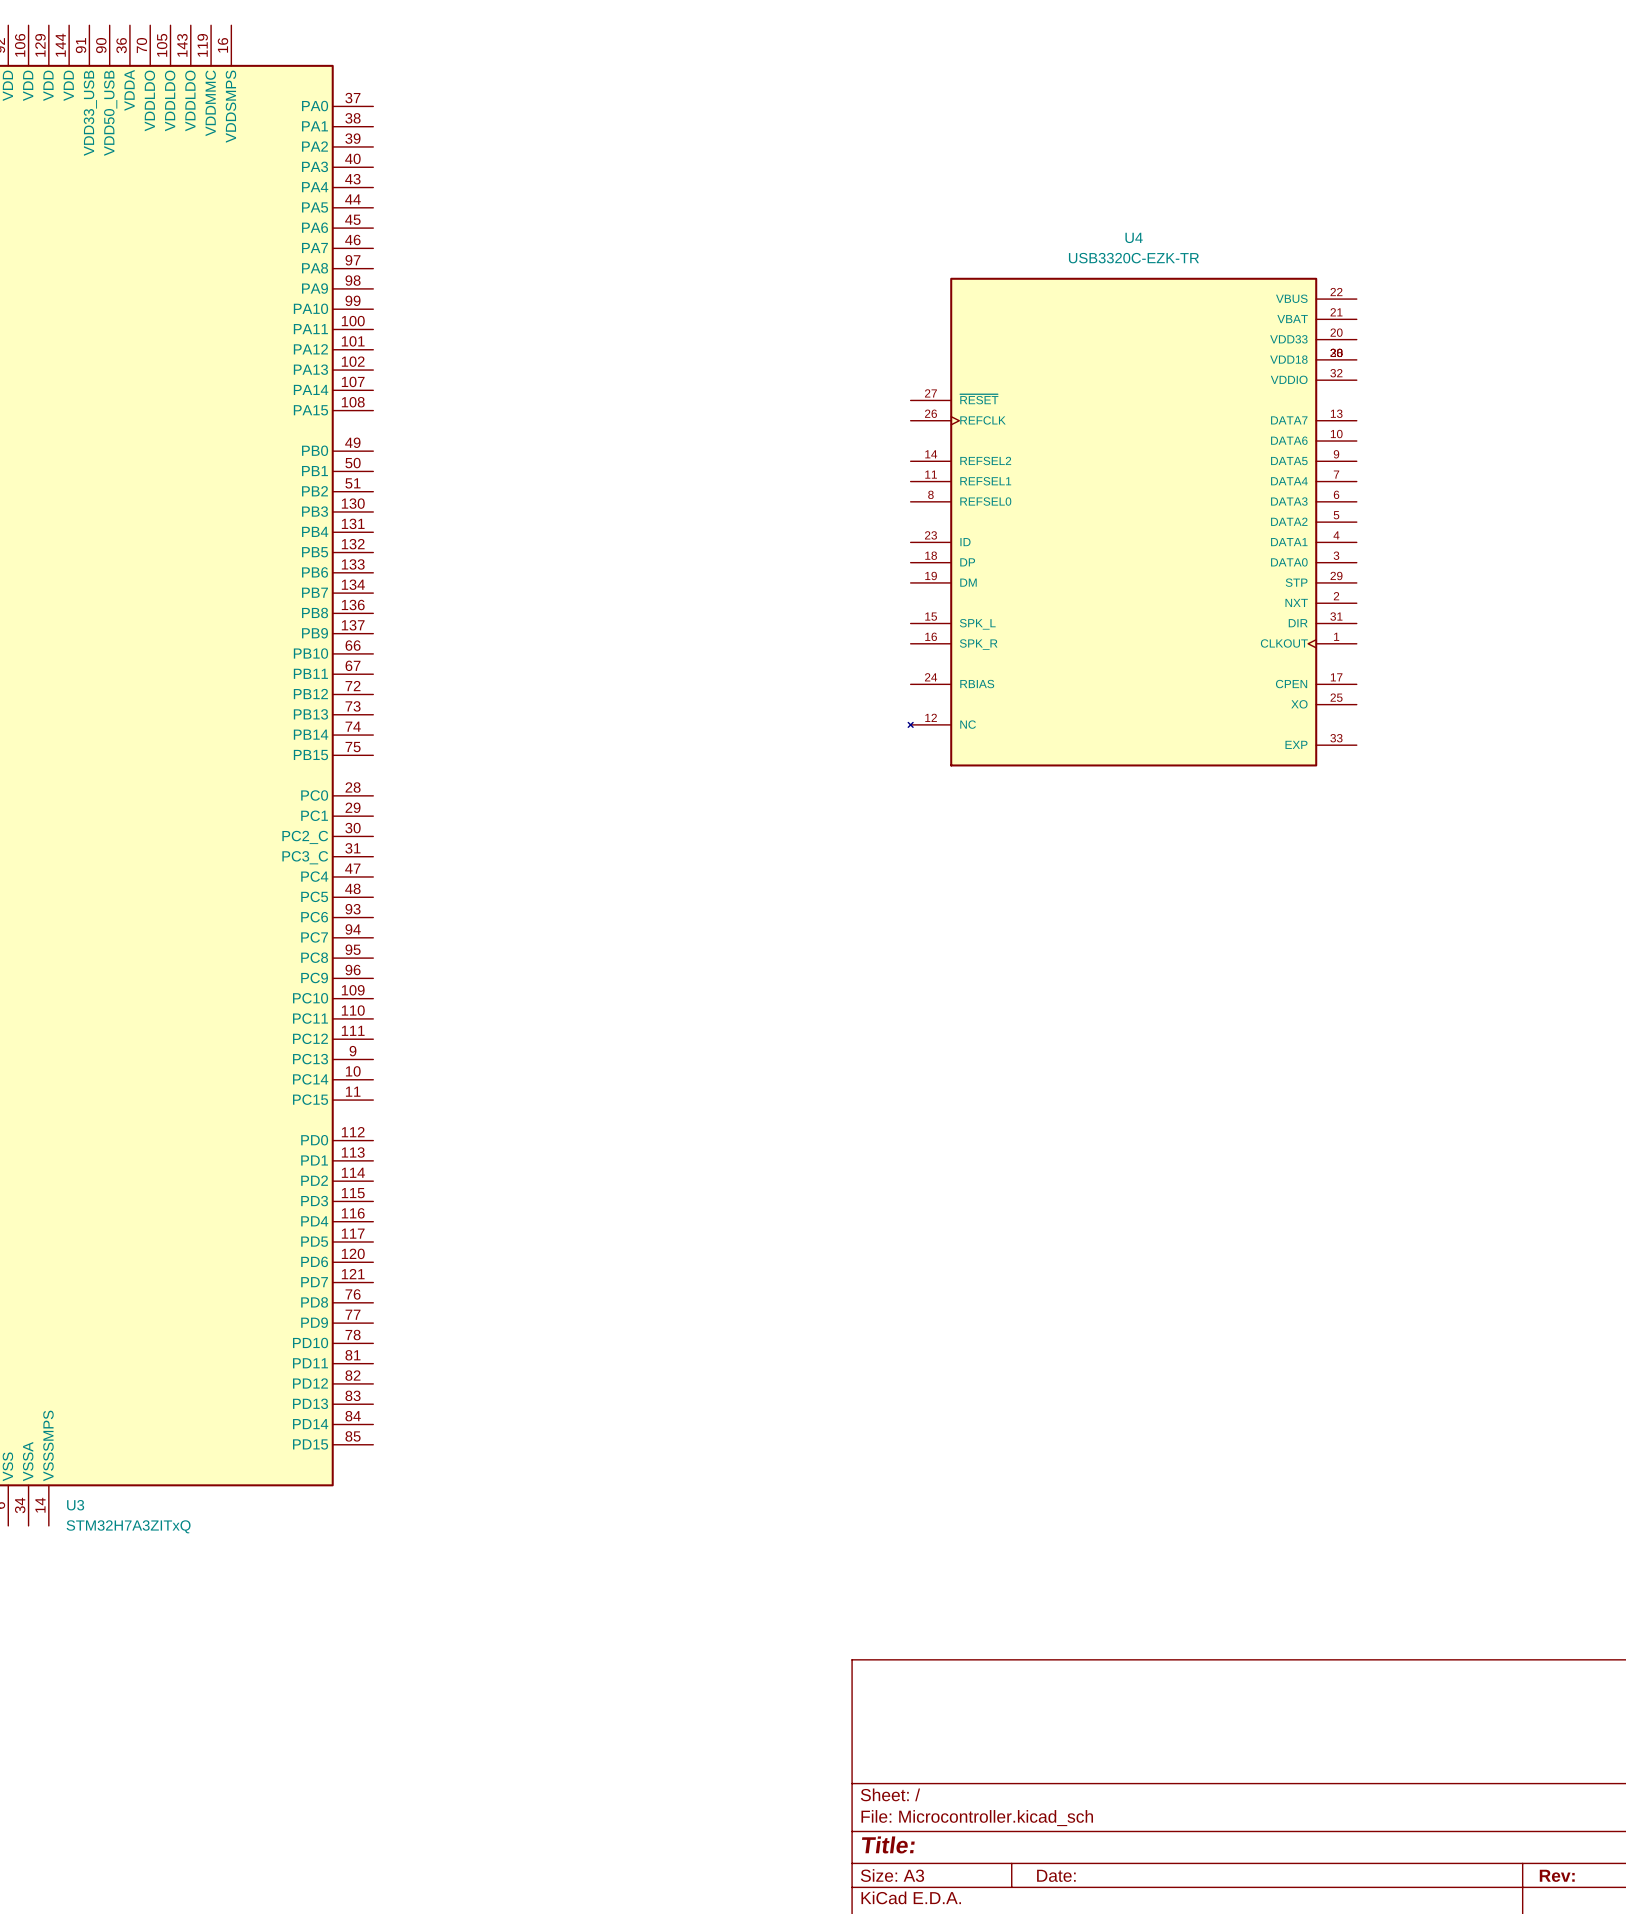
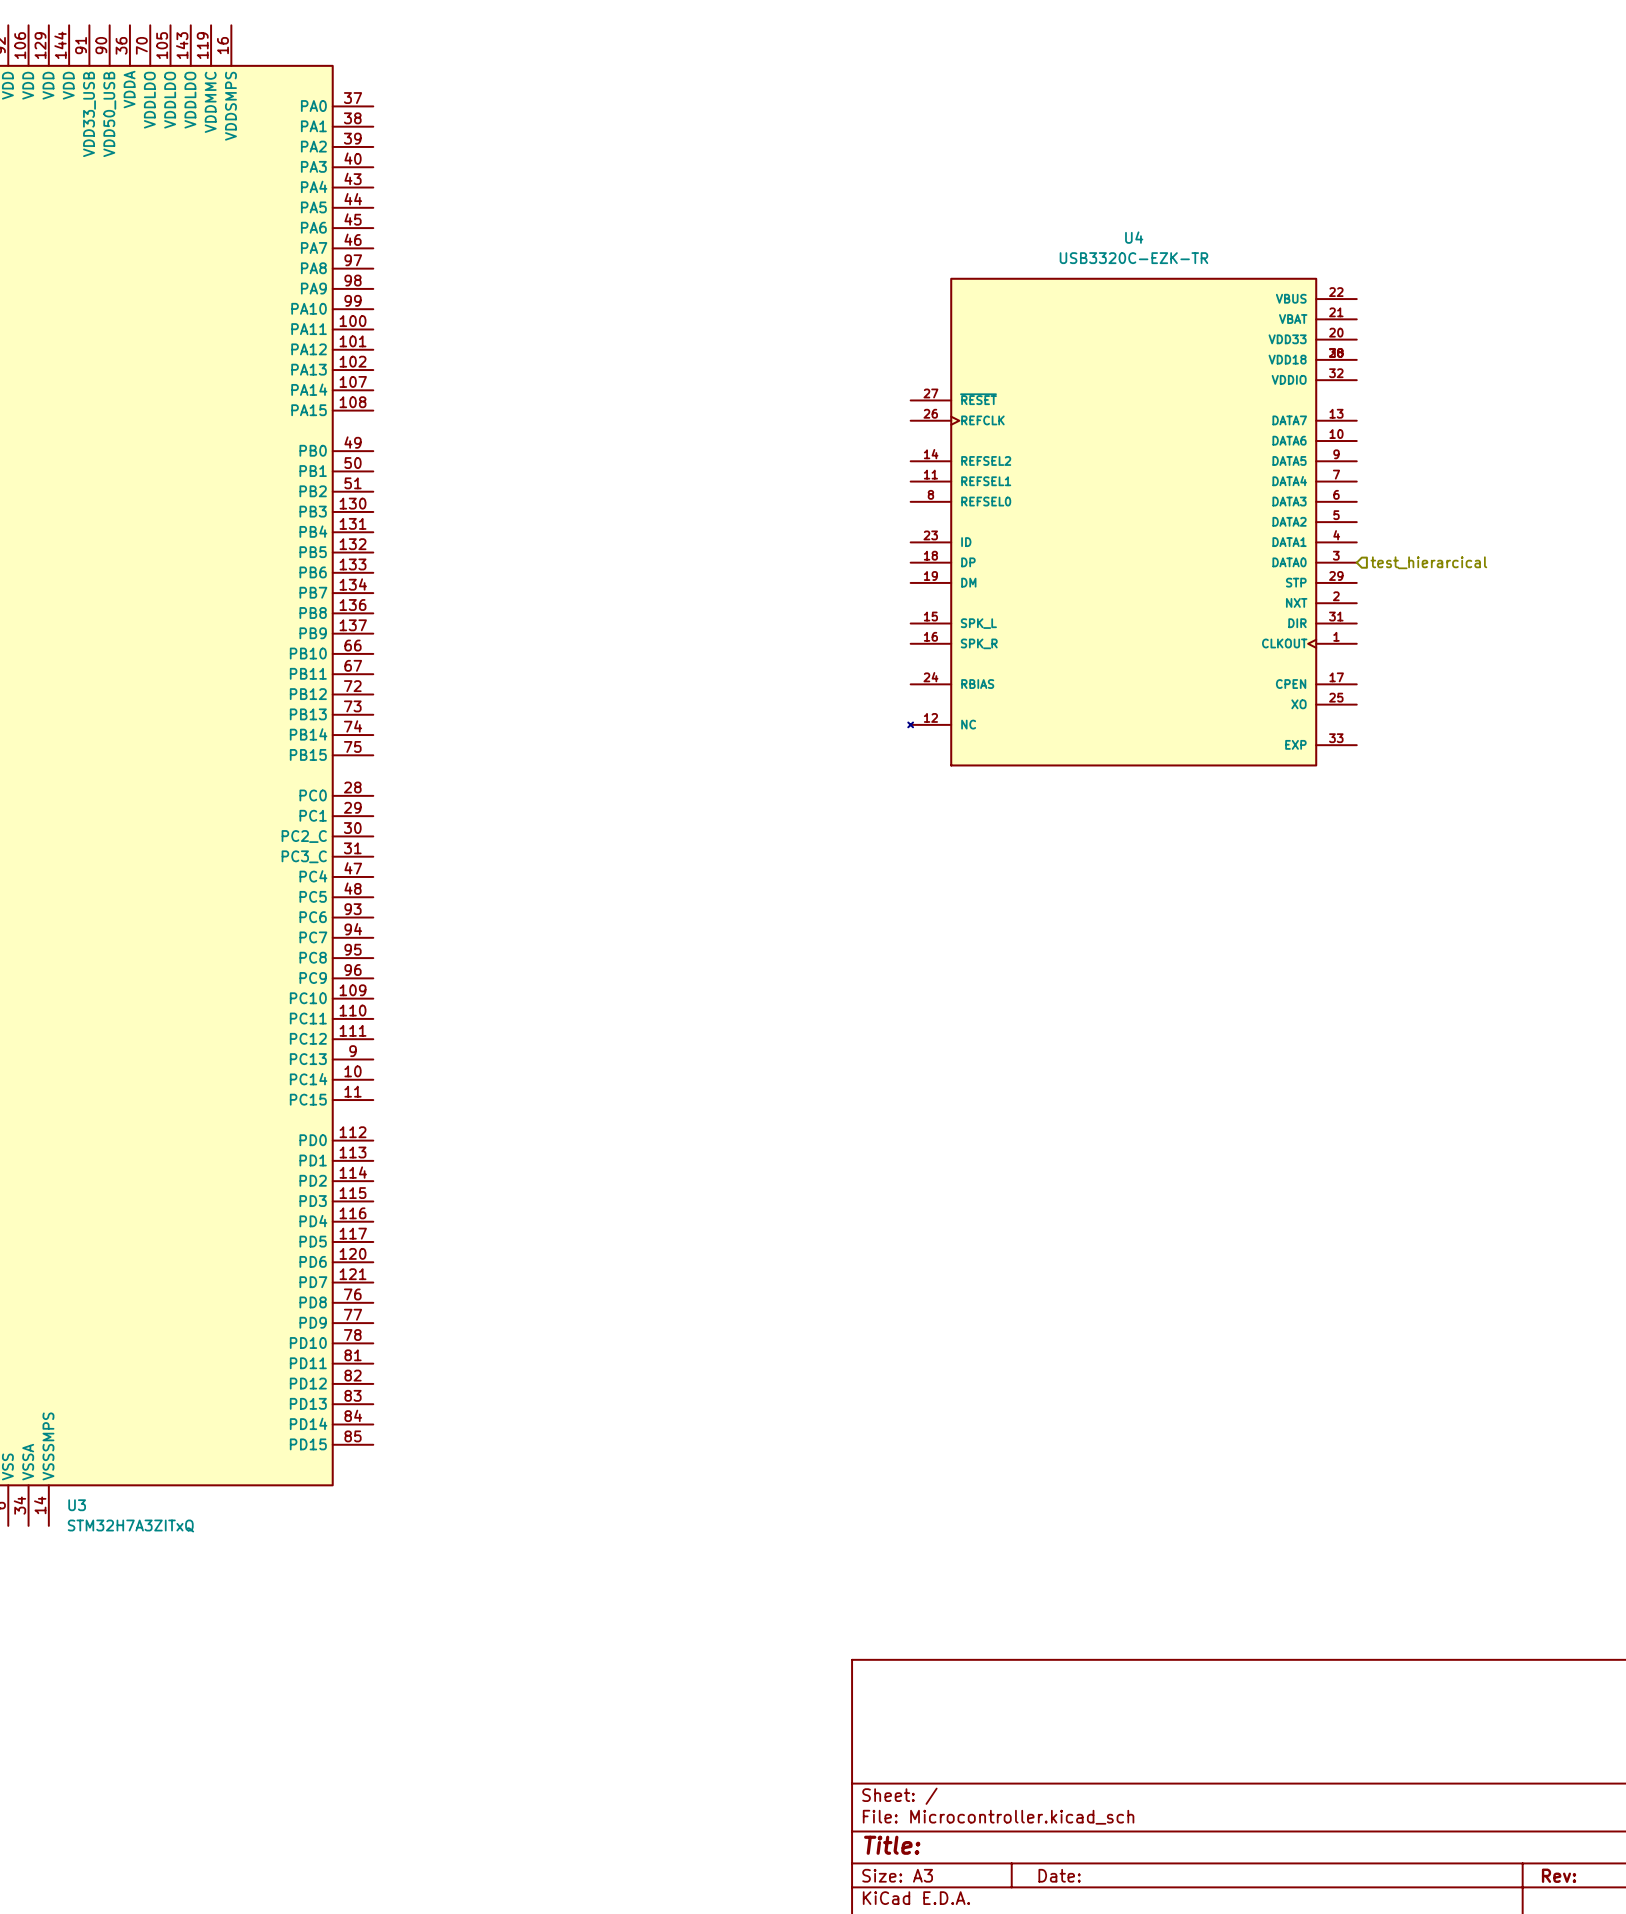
hierarchical label: none -> test_hierarcical (1428, 562)

